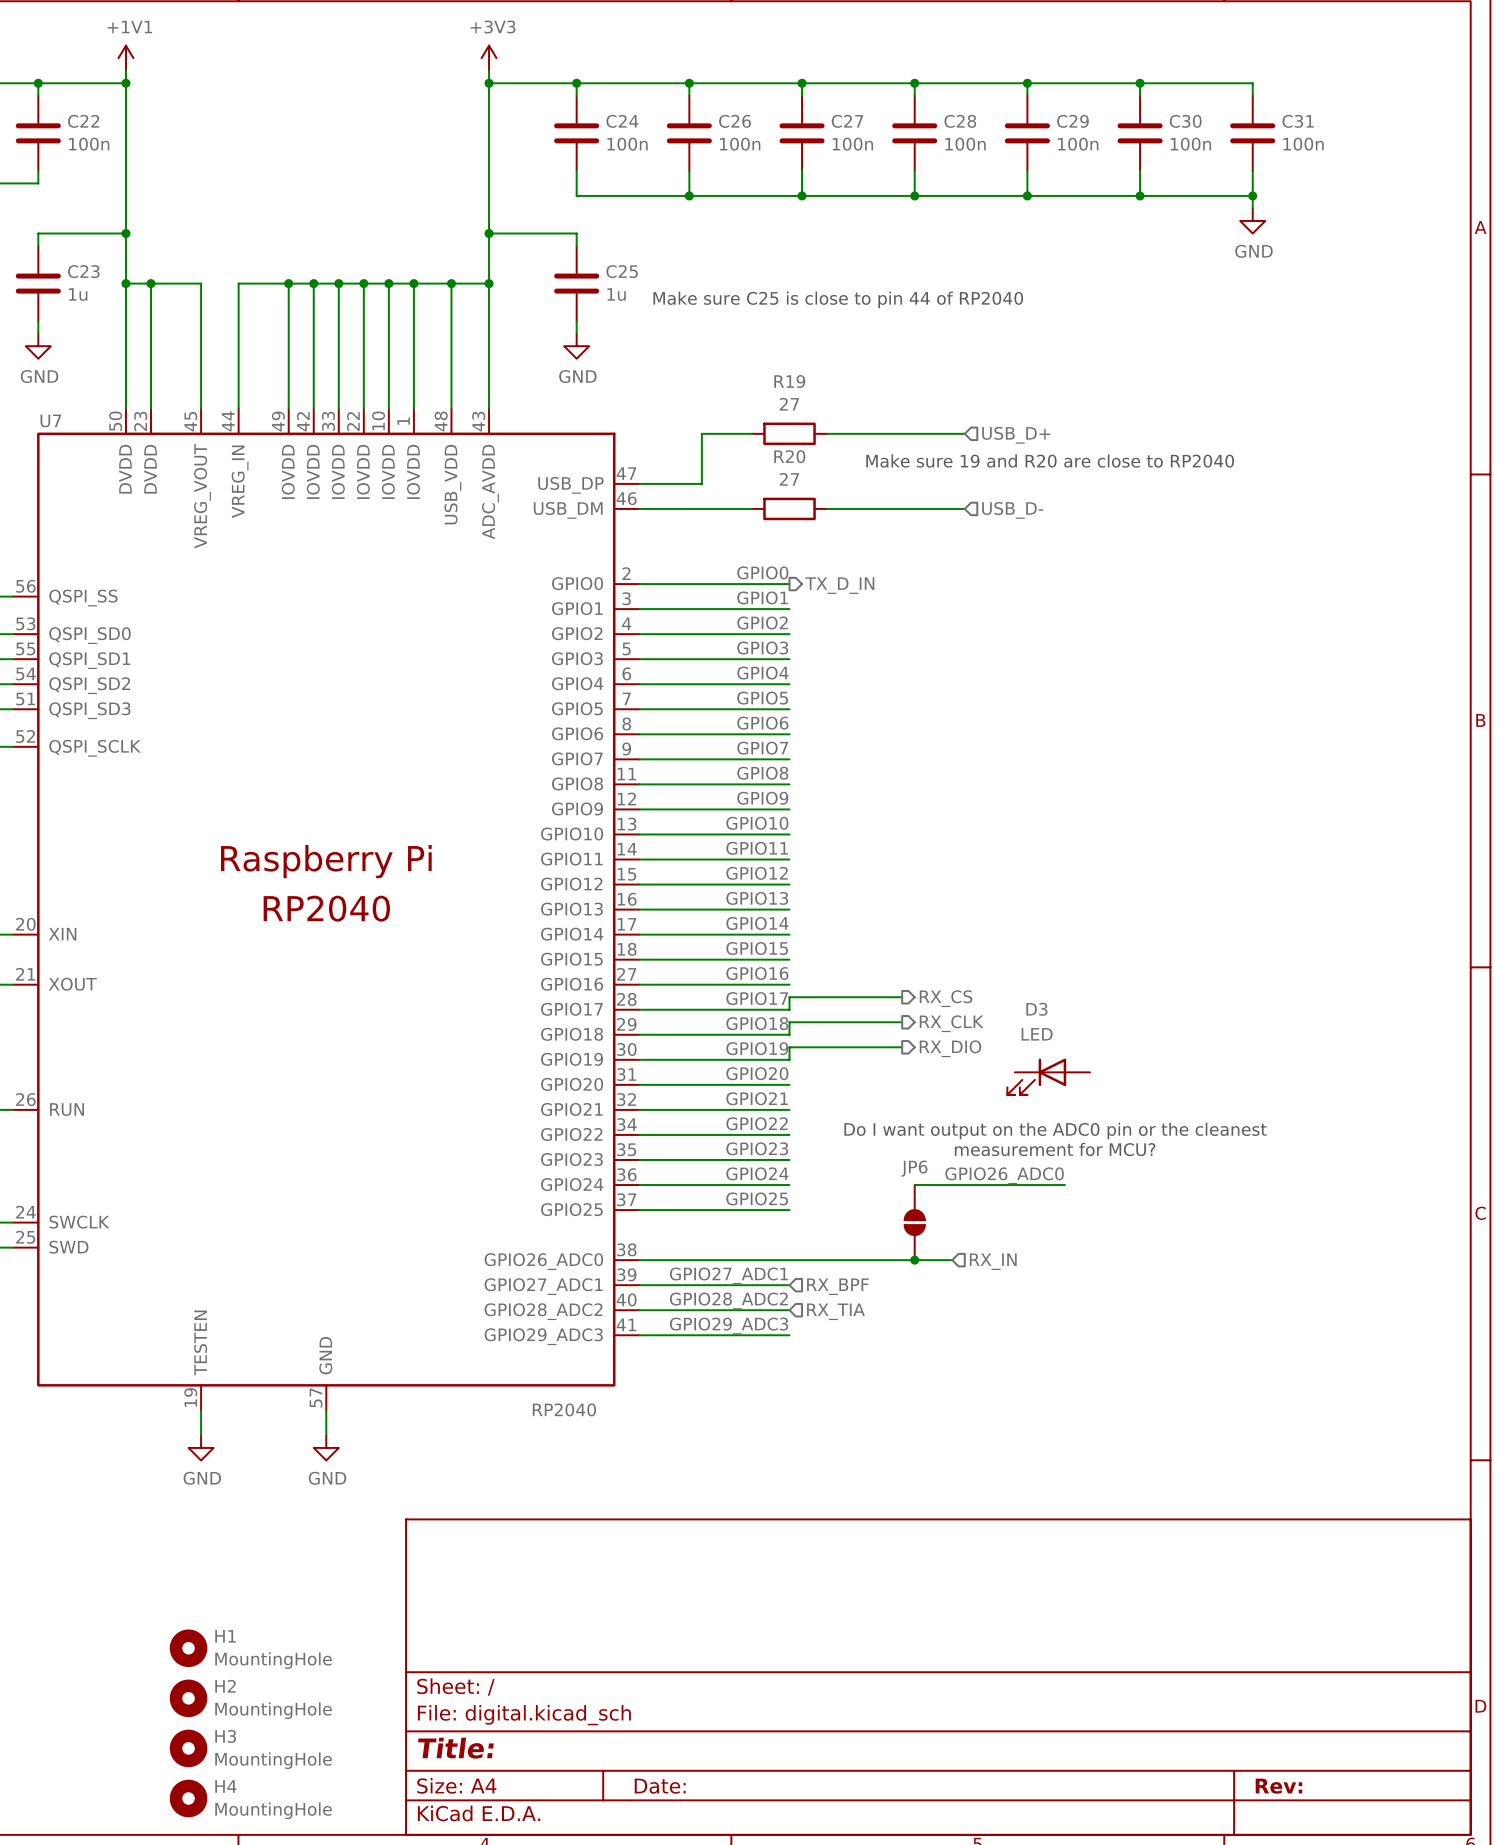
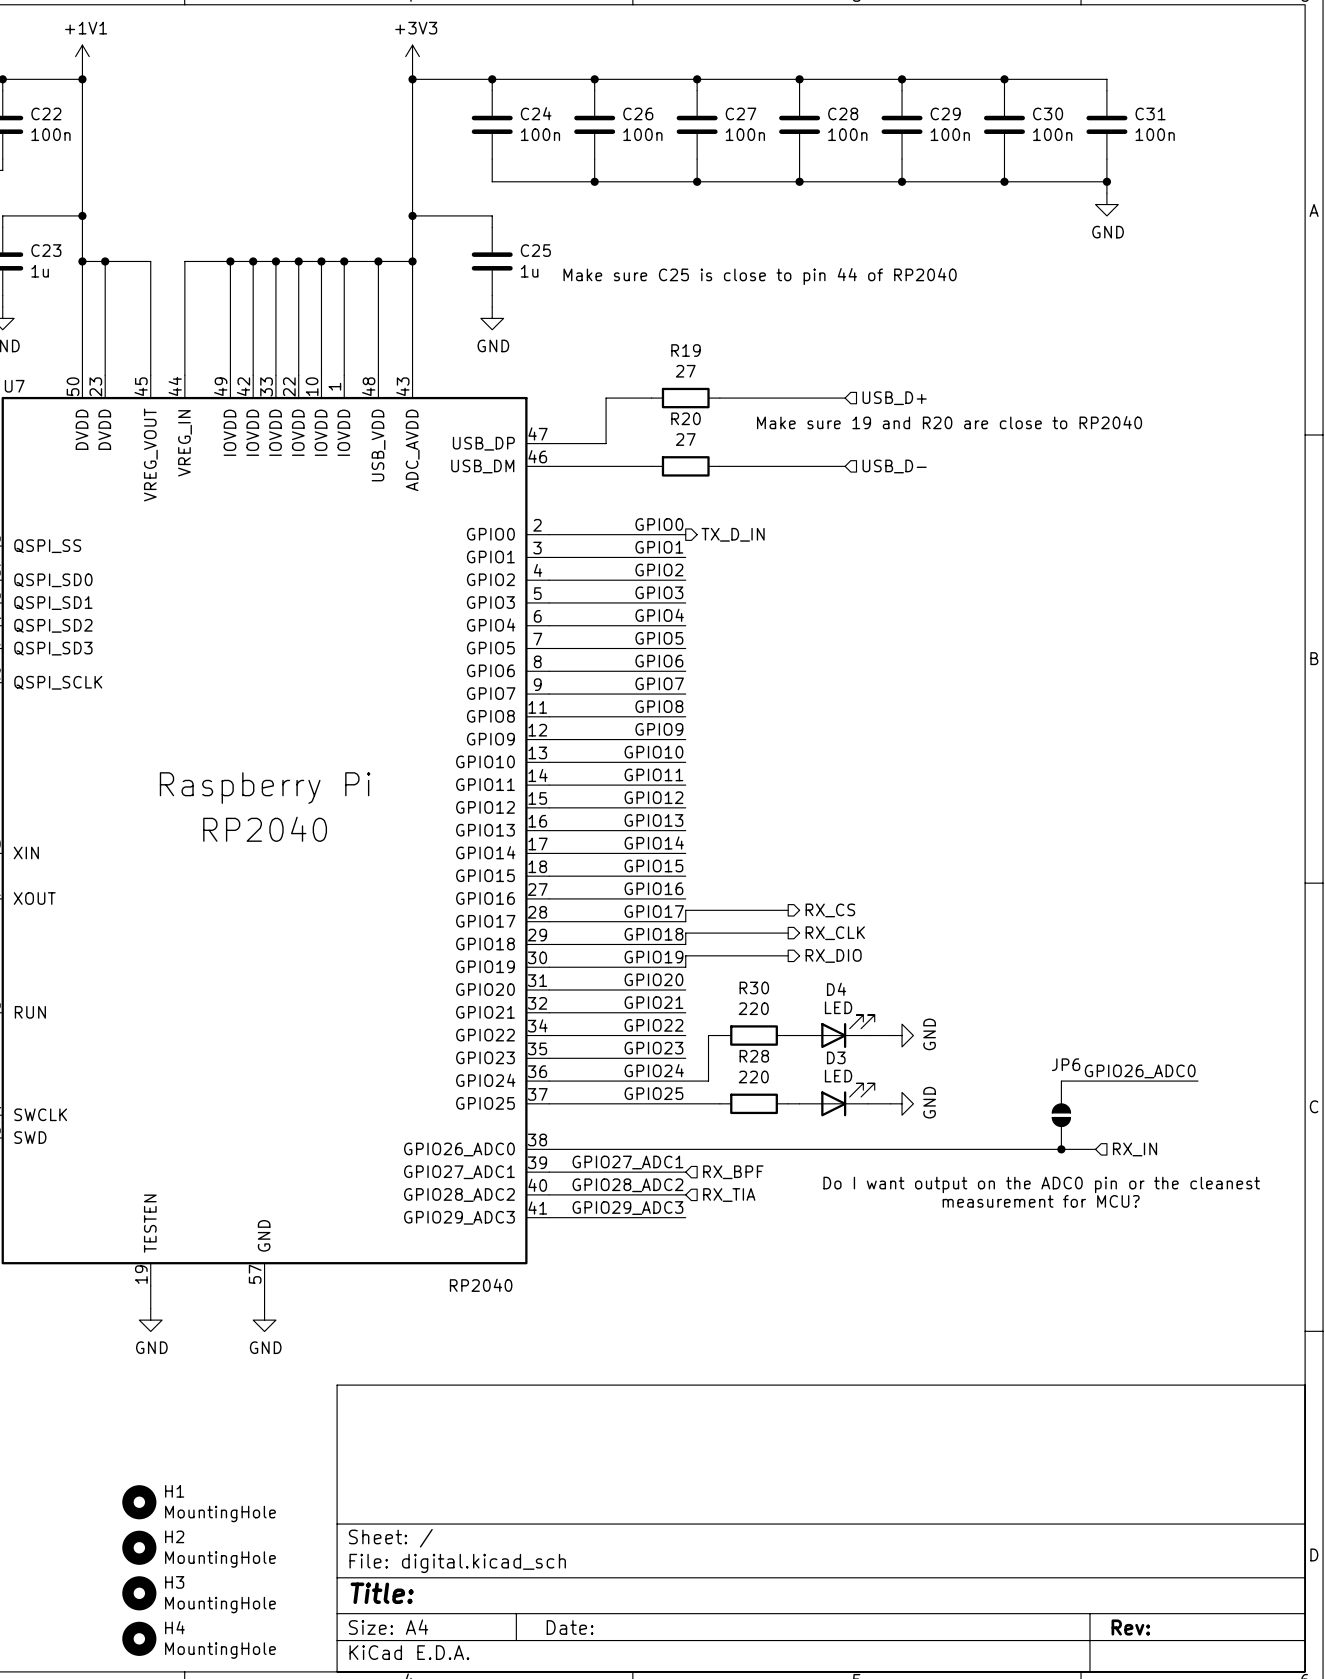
D3 name position: D3 (1036, 1009) -> D3 (836, 1057)
D3 value position: LED (1037, 1034) -> LED (838, 1076)
D3 rotation: 0° (1036, 1076) -> 180° (847, 1099)
D3 position: (1048, 1076) -> (837, 1099)
D4: none -> LED (837, 1031)
text position: Do I want output on the ADC0 pin or the cleanest (1055, 1130) -> Do I want output on the ADC0 pin or the cleanest (1041, 1184)
wire: none -> (719, 1035) (708, 1035) (708, 1081) (685, 1081)
R30: none -> 220 (754, 1035)
wire: none -> (788, 1035) (799, 1035)
wire: none -> (867, 1035) (890, 1035)
power symbol: none -> GND (902, 1035)
text position: measurement for MCU? (1055, 1149) -> measurement for MCU? (1041, 1201)
label: GPIO26_ADC0 (1004, 1175) -> none
label: none -> GPIO26_ADC0 (1140, 1071)
wire: (914, 1185) (1064, 1185) -> none
wire: none -> (1061, 1081) (1197, 1081)
wire: none -> (685, 1103) (719, 1103)
R28: none -> 220 (754, 1103)
wire: none -> (788, 1103) (799, 1103)
wire: none -> (867, 1103) (890, 1103)
power symbol: none -> GND (902, 1103)
JP6 position: (914, 1222) -> (1061, 1115)
junction: (914, 1260) -> none
wire: none -> (833, 1149) (1095, 1149)
junction: none -> (1061, 1149)
hierarchical label: RX_IN (993, 1261) -> none
hierarchical label: none -> RX_IN (1135, 1149)

